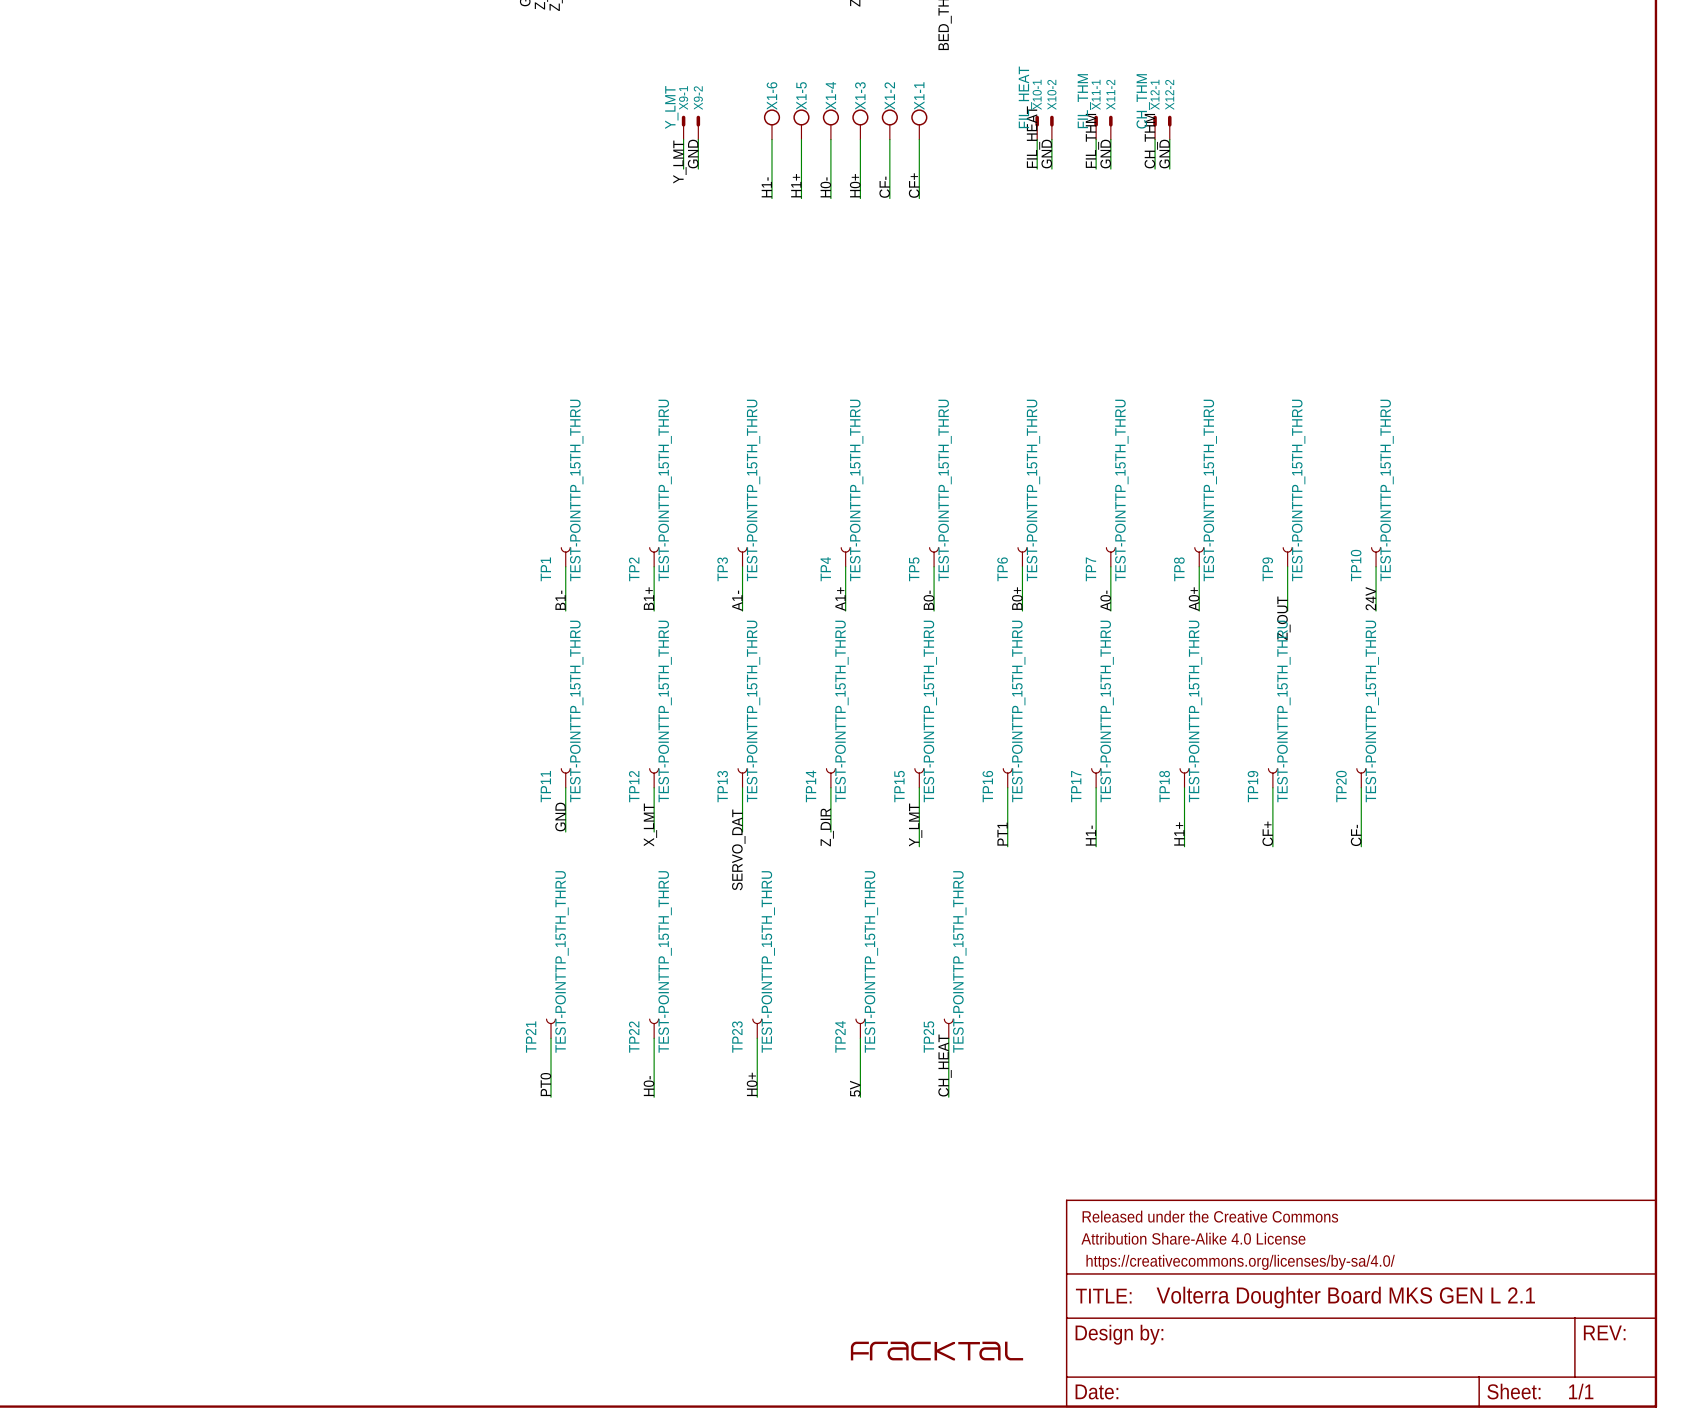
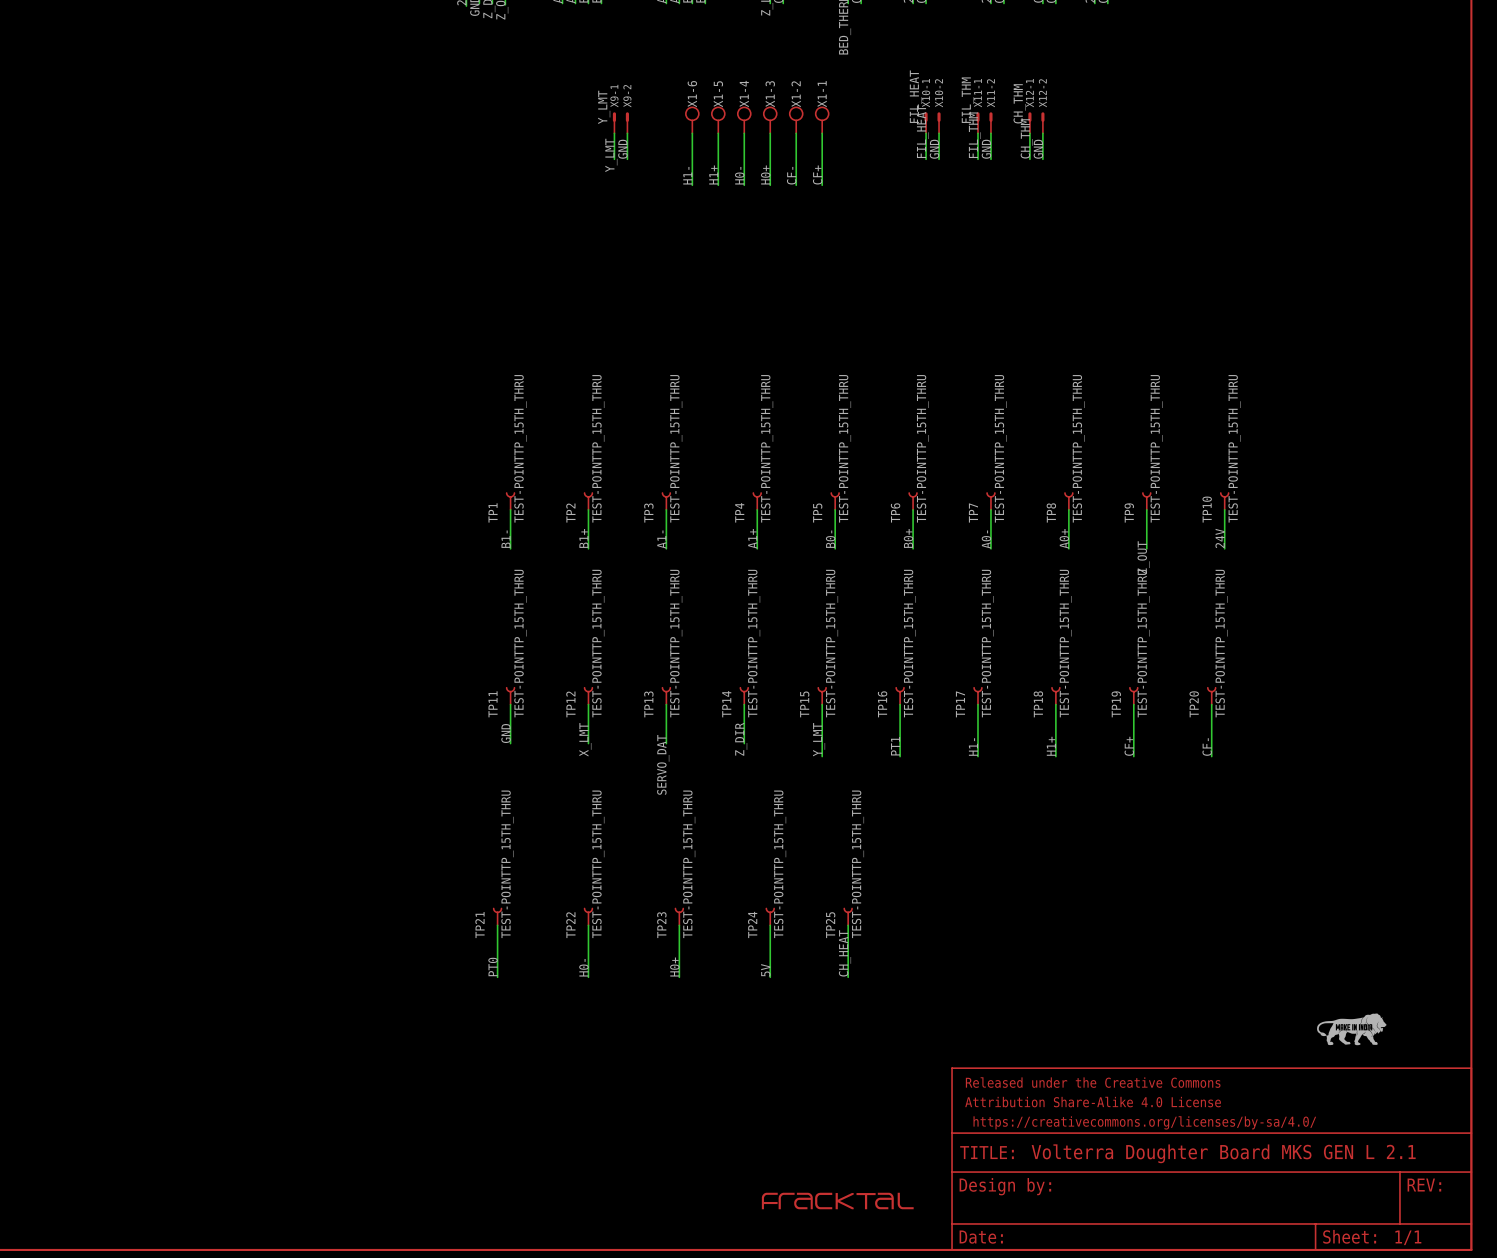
part: none -> (1351, 1029)

